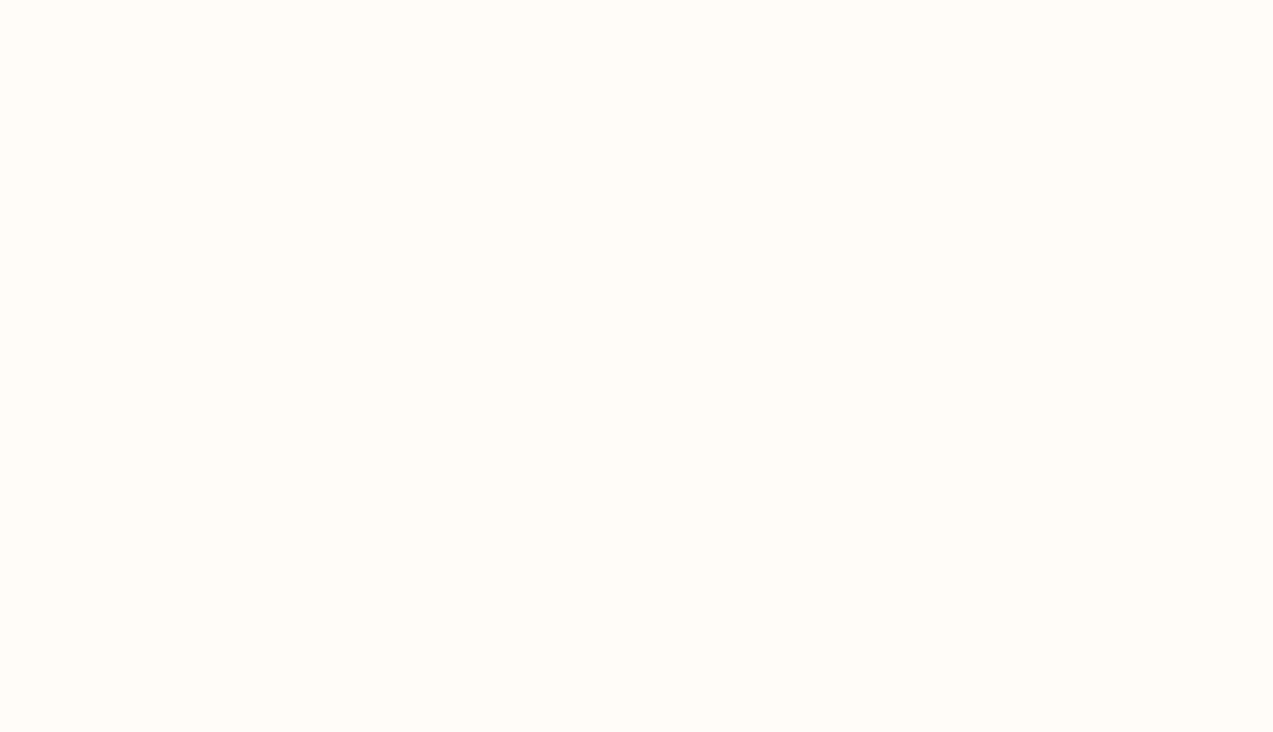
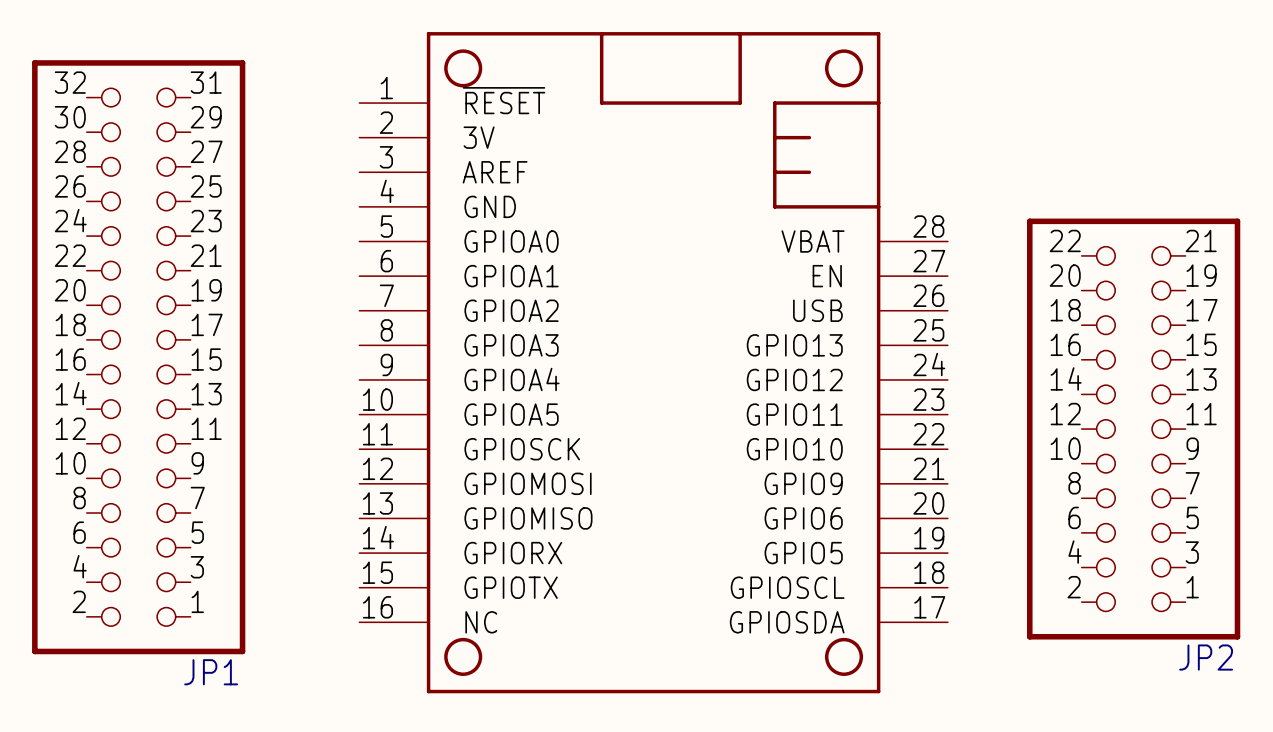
JP1: none -> (138, 357)
part: none -> (653, 362)
JP2: none -> (1133, 429)

